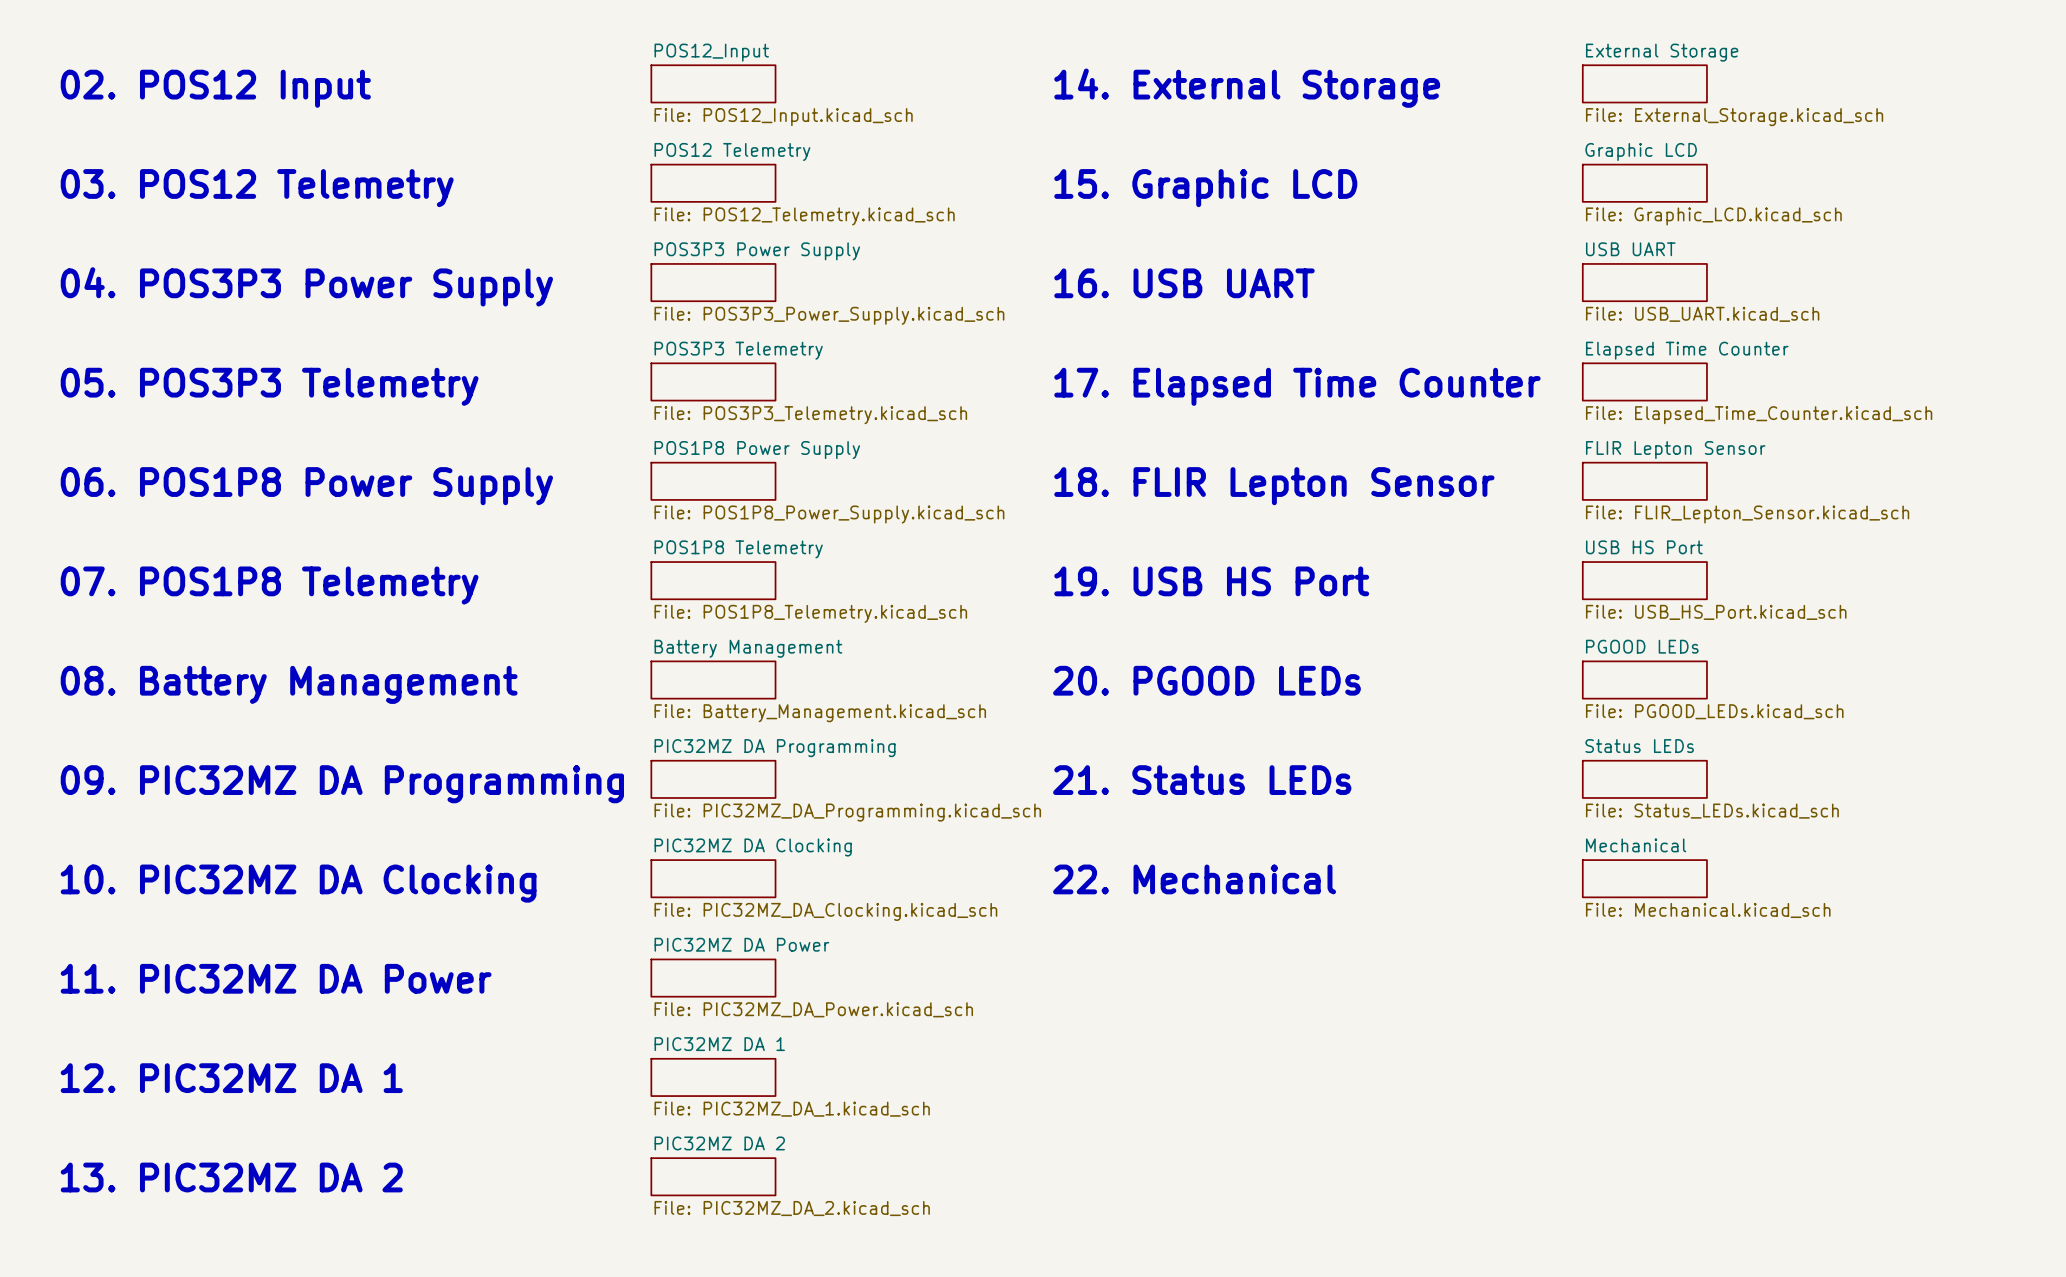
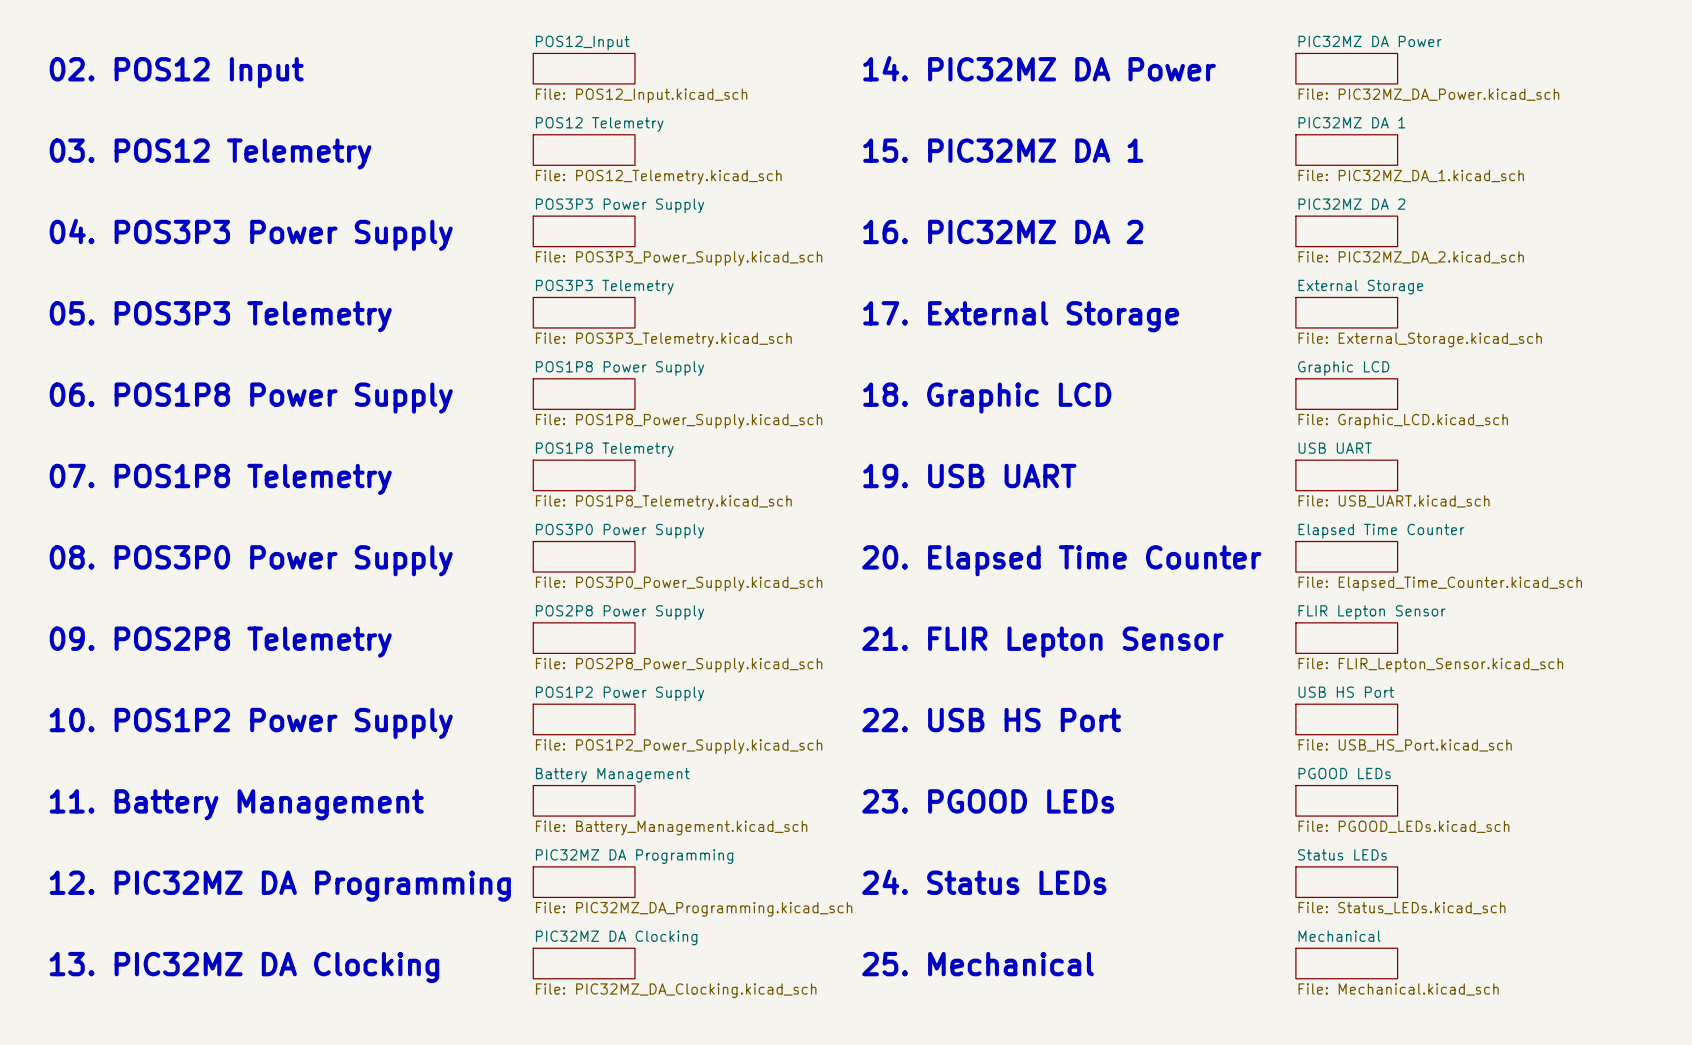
sheet External Storage name: External Storage (1662, 52) -> PIC32MZ DA Power (1370, 41)
text: 14. External Storage (1247, 88) -> 14. PIC32MZ DA Power (1039, 68)
sheet External Storage value: File: External_Storage.kicad_sch (1734, 117) -> File: PIC32MZ_DA_Power.kicad_sch (1428, 94)
sheet Graphic LCD name: Graphic LCD (1641, 151) -> PIC32MZ DA 1 (1351, 122)
text: 15. Graphic LCD (1205, 188) -> 15. PIC32MZ DA 1 (1003, 150)
sheet Graphic LCD value: File: Graphic_LCD.kicad_sch (1713, 216) -> File: PIC32MZ_DA_1.kicad_sch (1411, 176)
sheet USB UART name: USB UART (1630, 249) -> PIC32MZ DA 2 (1351, 204)
text: 16. USB UART (1184, 283) -> 16. PIC32MZ DA 2 (1003, 231)
sheet USB UART value: File: USB_UART.kicad_sch (1702, 314) -> File: PIC32MZ_DA_2.kicad_sch (1411, 257)
sheet Elapsed Time Counter name: Elapsed Time Counter (1687, 350) -> External Storage (1360, 287)
text: 17. Elapsed Time Counter (1297, 386) -> 17. External Storage (1021, 316)
sheet Elapsed Time Counter value: File: Elapsed_Time_Counter.kicad_sch (1759, 415) -> File: External_Storage.kicad_sch (1420, 339)
sheet FLIR Lepton Sensor name: FLIR Lepton Sensor (1675, 450) -> Graphic LCD (1343, 368)
text: 18. FLIR Lepton Sensor (1274, 486) -> 18. Graphic LCD (987, 398)
sheet FLIR Lepton Sensor value: File: FLIR_Lepton_Sensor.kicad_sch (1747, 514) -> File: Graphic_LCD.kicad_sch (1403, 421)
sheet USB HS Port name: USB HS Port (1644, 547) -> USB UART (1335, 448)
text: 19. USB HS Port (1211, 581) -> 19. USB UART (969, 476)
sheet USB HS Port value: File: USB_HS_Port.kicad_sch (1716, 612) -> File: USB_UART.kicad_sch (1394, 501)
sheet PGOOD LEDs name: PGOOD LEDs (1642, 646) -> Elapsed Time Counter (1381, 531)
sheet Battery Management name: Battery Management (748, 648) -> POS3P0 Power Supply (620, 531)
text: 20. PGOOD LEDs (1206, 680) -> 20. Elapsed Time Counter (1061, 560)
text: 08. Battery Management (289, 684) -> 08. POS3P0 Power Supply (251, 560)
sheet PGOOD LEDs value: File: PGOOD_LEDs.kicad_sch (1714, 711) -> File: Elapsed_Time_Counter.kicad_sch (1440, 583)
sheet Battery Management value: File: Battery_Management.kicad_sch (820, 713) -> File: POS3P0_Power_Supply.kicad_sch (679, 583)
sheet Status LEDs name: Status LEDs (1639, 746) -> FLIR Lepton Sensor (1372, 612)
sheet PIC32MZ DA Programming name: PIC32MZ DA Programming (775, 748) -> POS2P8 Power Supply (620, 612)
text: 21. Status LEDs (1202, 780) -> 21. FLIR Lepton Sensor (1042, 642)
text: 09. PIC32MZ DA Programming (342, 784) -> 09. POS2P8 Telemetry (220, 642)
sheet Status LEDs value: File: Status_LEDs.kicad_sch (1712, 811) -> File: FLIR_Lepton_Sensor.kicad_sch (1430, 665)
sheet PIC32MZ DA Programming value: File: PIC32MZ_DA_Programming.kicad_sch (847, 812) -> File: POS2P8_Power_Supply.kicad_sch (679, 665)
sheet Mechanical name: Mechanical (1636, 845) -> USB HS Port (1346, 692)
sheet PIC32MZ DA Clocking name: PIC32MZ DA Clocking (753, 847) -> POS1P2 Power Supply (620, 693)
text: 22. Mechanical (1194, 879) -> 22. USB HS Port (991, 720)
text: 10. PIC32MZ DA Clocking (298, 883) -> 10. POS1P2 Power Supply (251, 723)
sheet Mechanical value: File: Mechanical.kicad_sch (1708, 910) -> File: USB_HS_Port.kicad_sch (1405, 745)
sheet PIC32MZ DA Clocking value: File: PIC32MZ_DA_Clocking.kicad_sch (825, 911) -> File: POS1P2_Power_Supply.kicad_sch (679, 746)
sheet PIC32MZ DA Power name: PIC32MZ DA Power (741, 944) -> Battery Management (612, 775)
text: 11. PIC32MZ DA Power (276, 978) -> 11. Battery Management (236, 804)
text: none -> 23. PGOOD LEDs (988, 801)
sheet PGOOD LEDs: none -> File: PGOOD_LEDs.kicad_sch (1346, 800)
sheet PIC32MZ DA Power value: File: PIC32MZ_DA_Power.kicad_sch (813, 1009) -> File: Battery_Management.kicad_sch (671, 828)
sheet PIC32MZ DA 1 name: PIC32MZ DA 1 (719, 1044) -> PIC32MZ DA Programming (634, 856)
text: none -> 24. Status LEDs (984, 882)
sheet Status LEDs: none -> File: Status_LEDs.kicad_sch (1346, 882)
text: 12. PIC32MZ DA 1 (231, 1078) -> 12. PIC32MZ DA Programming (280, 886)
sheet PIC32MZ DA 1 value: File: PIC32MZ_DA_1.kicad_sch (792, 1109) -> File: PIC32MZ_DA_Programming.kicad_sch (694, 909)
sheet PIC32MZ DA 2 name: PIC32MZ DA 2 (719, 1143) -> PIC32MZ DA Clocking (616, 937)
sheet Mechanical: none -> File: Mechanical.kicad_sch (1346, 963)
text: 13. PIC32MZ DA 2 (231, 1177) -> 13. PIC32MZ DA Clocking (244, 967)
text: none -> 25. Mechanical (978, 964)
sheet PIC32MZ DA 2 value: File: PIC32MZ_DA_2.kicad_sch (792, 1208) -> File: PIC32MZ_DA_Clocking.kicad_sch (676, 990)

